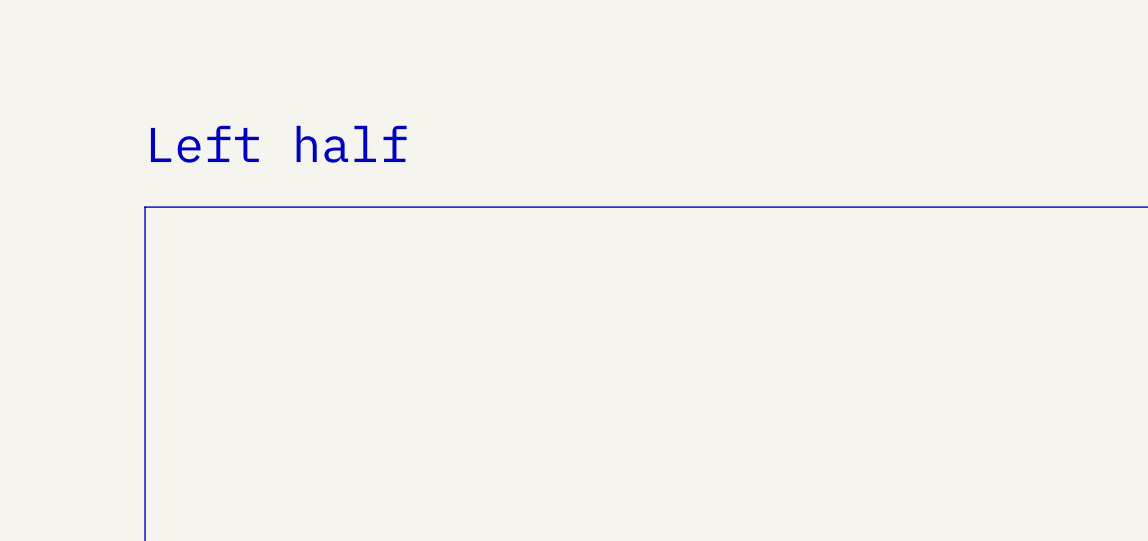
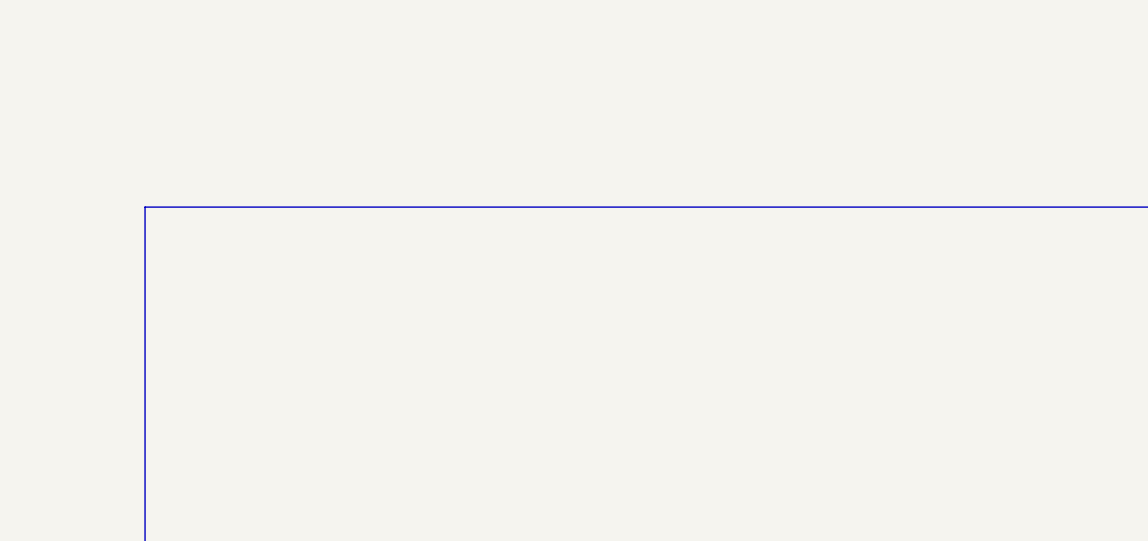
text: Left half (278, 144) -> none

